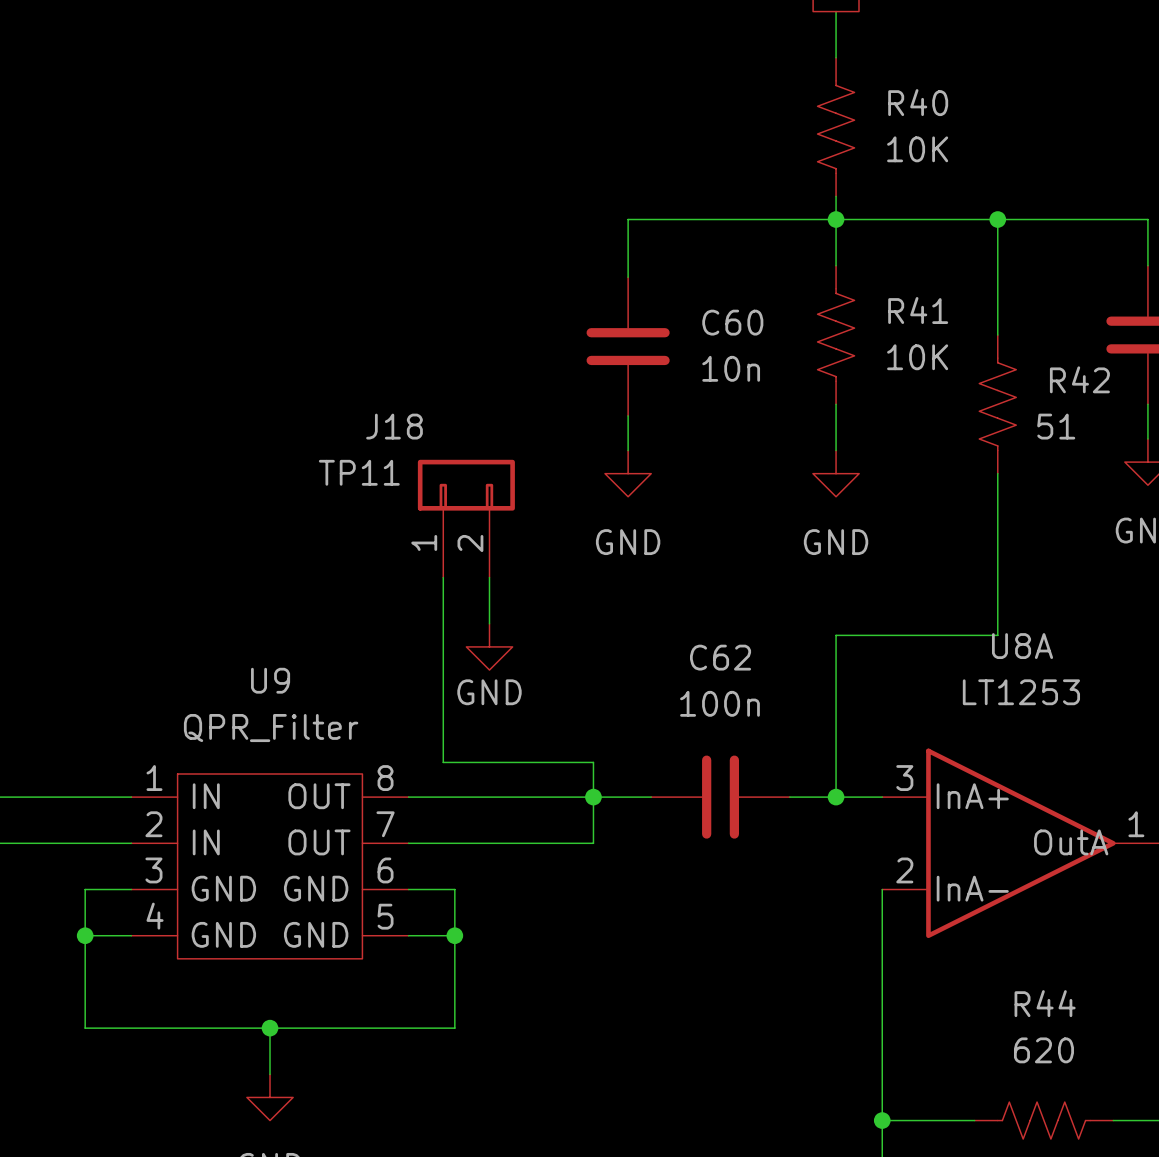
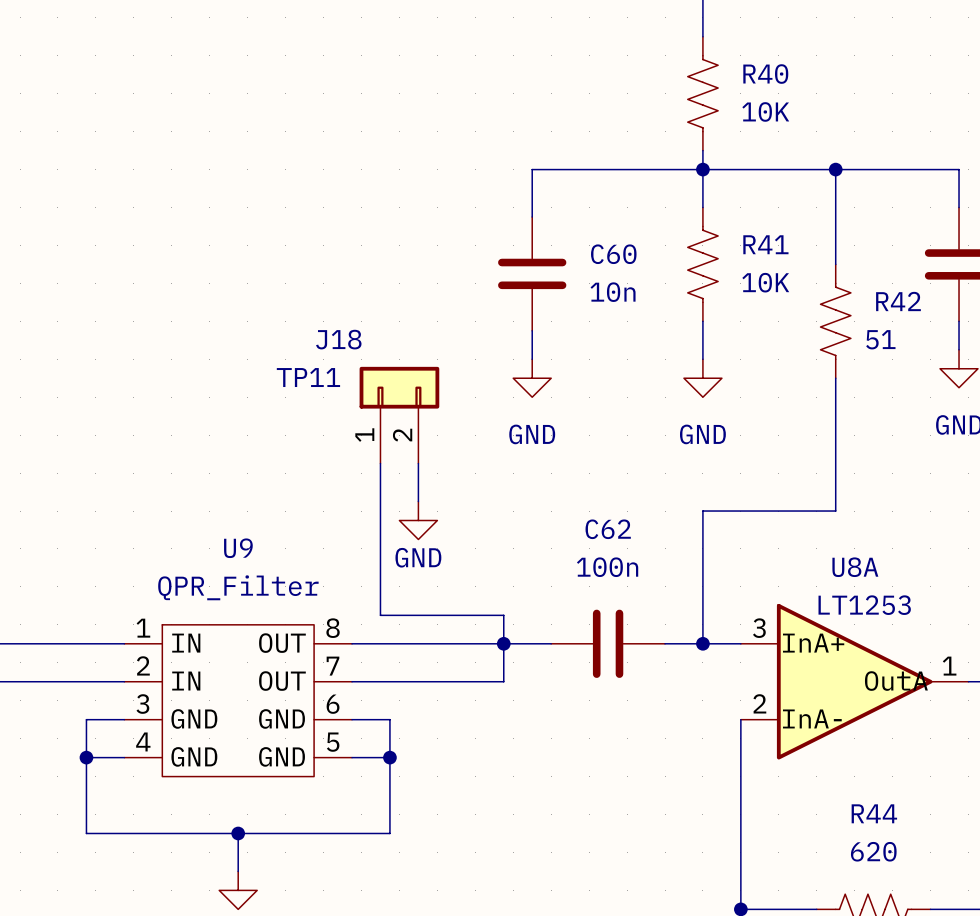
U8A name position: U8A (1022, 646) -> U8A (855, 567)
U8A value position: LT1253 (1021, 692) -> LT1253 (864, 605)

